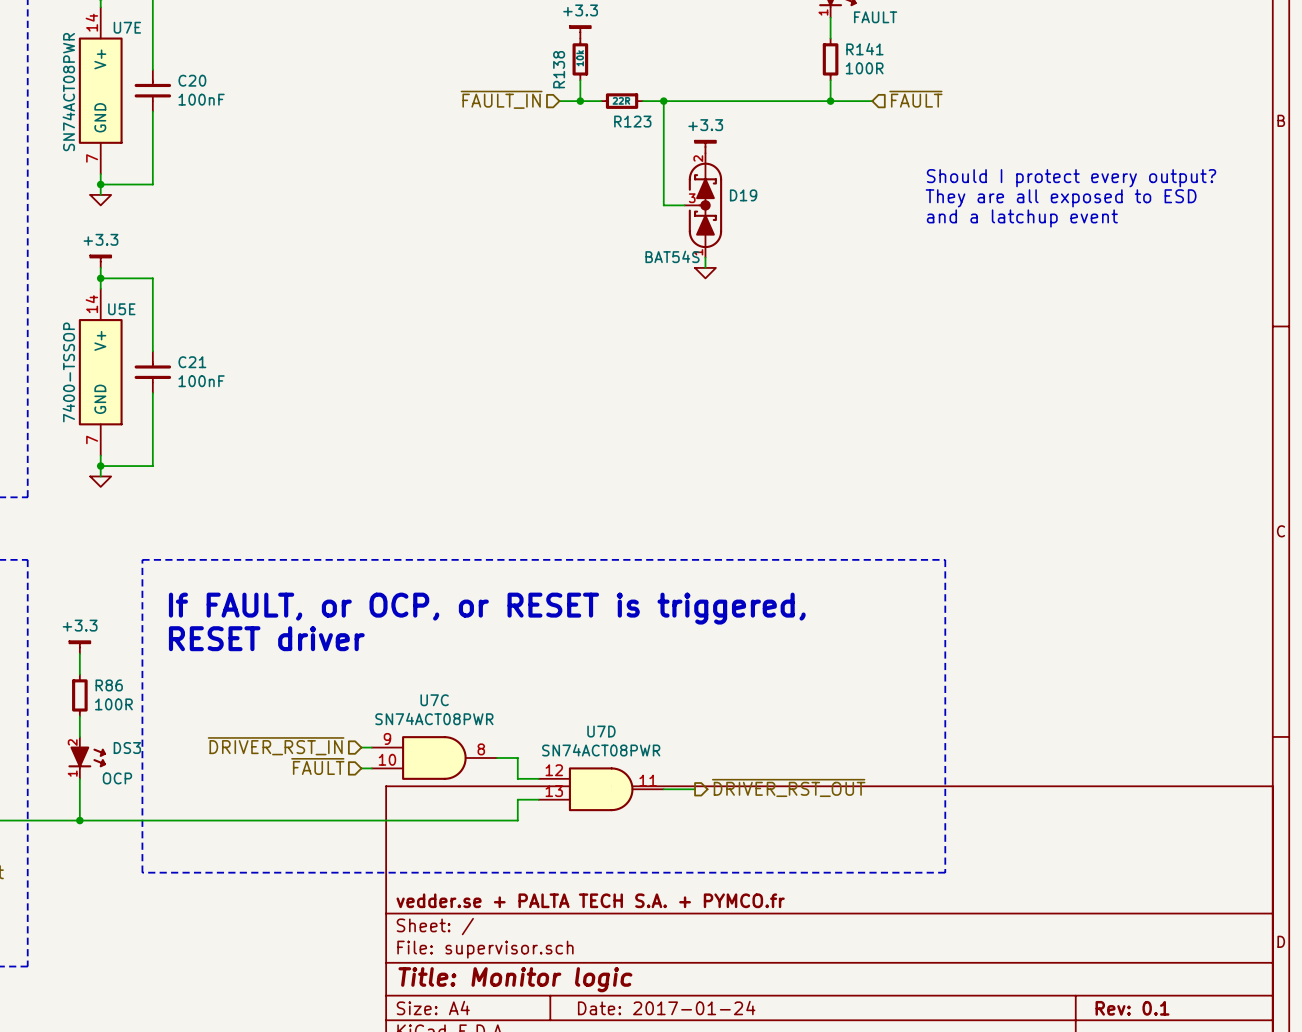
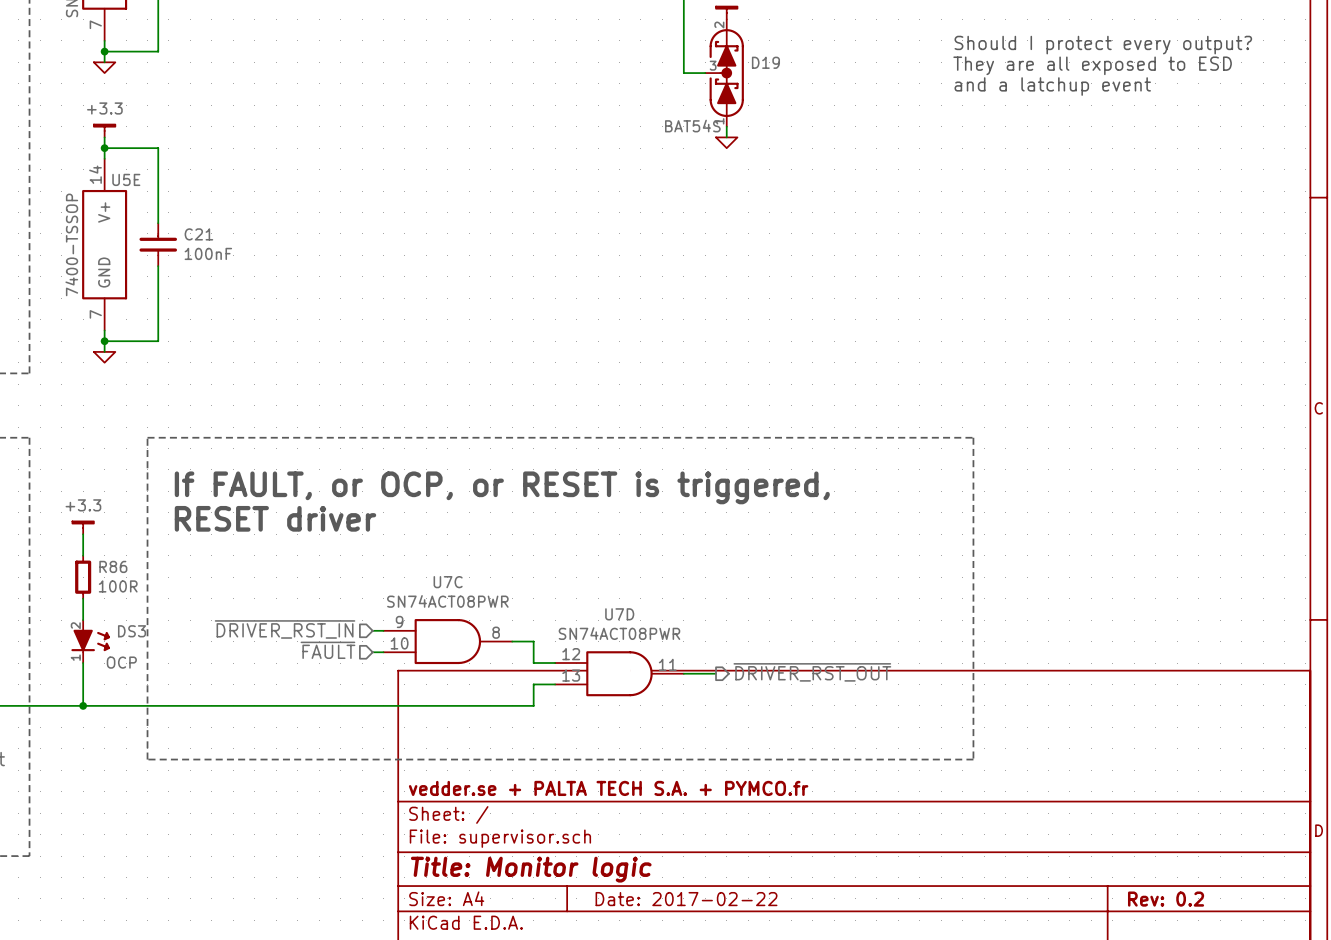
title block: Date: 2017-01-24 (666, 1008) -> Date: 2017-02-22 (686, 899)
title block: Rev: 0.1 (1132, 1008) -> Rev: 0.2 (1166, 899)

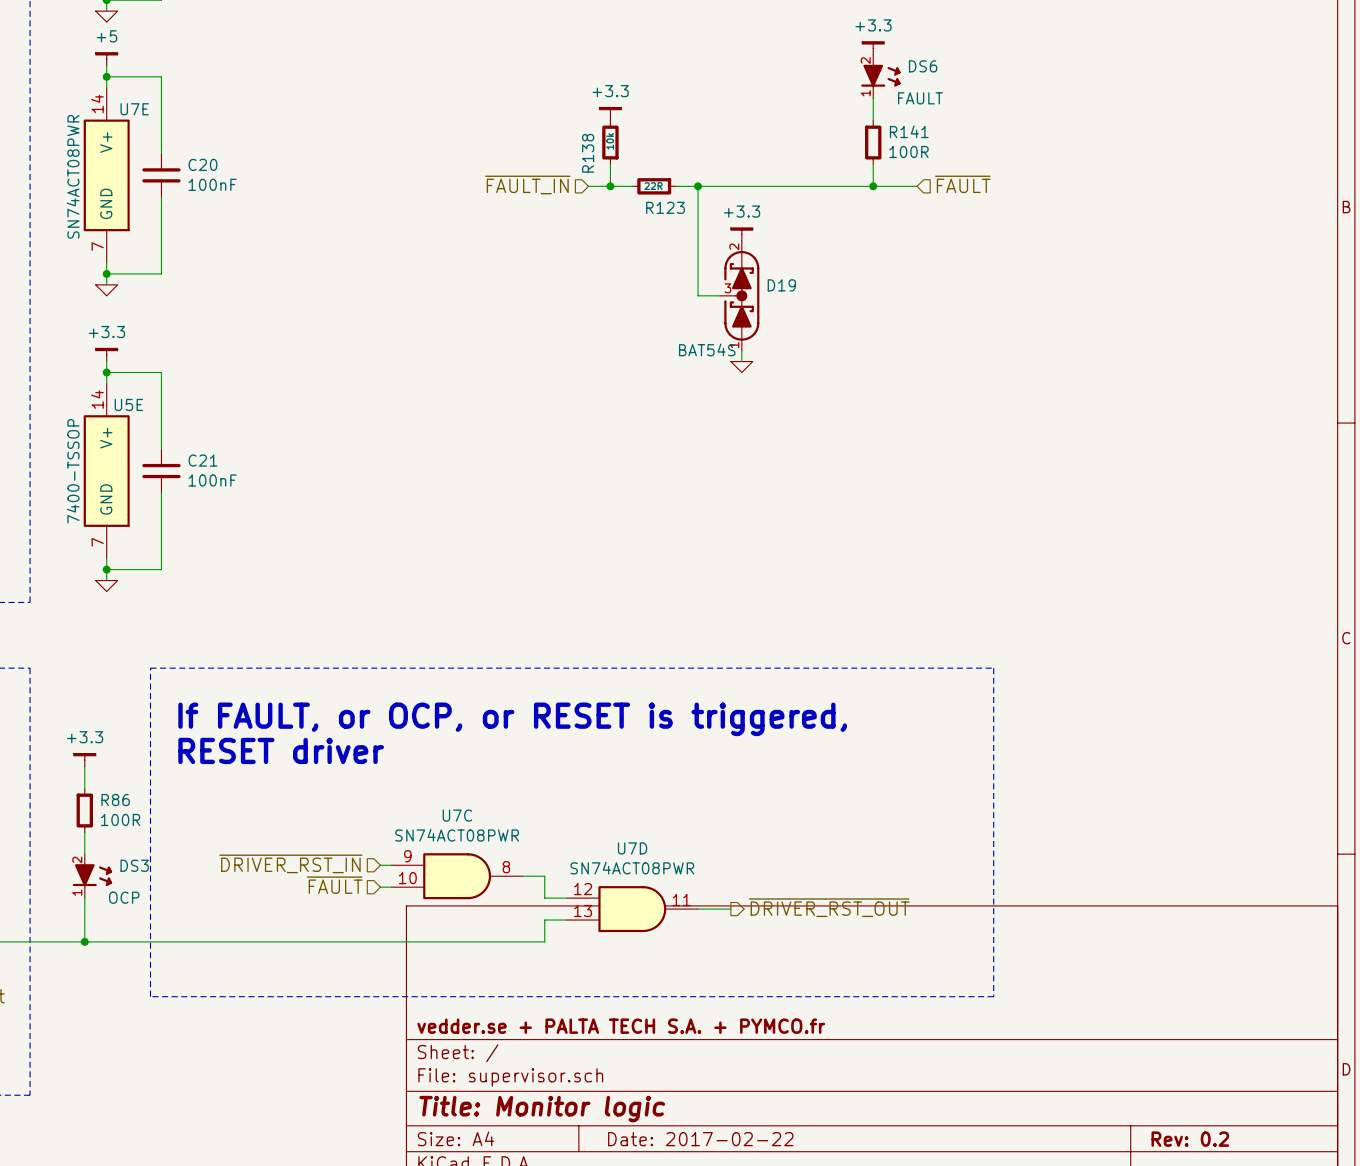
text: Should I protect every output? (1103, 45) -> none
text: They are all exposed to ESD (1092, 65) -> none
text: and a latchup event (1052, 86) -> none

